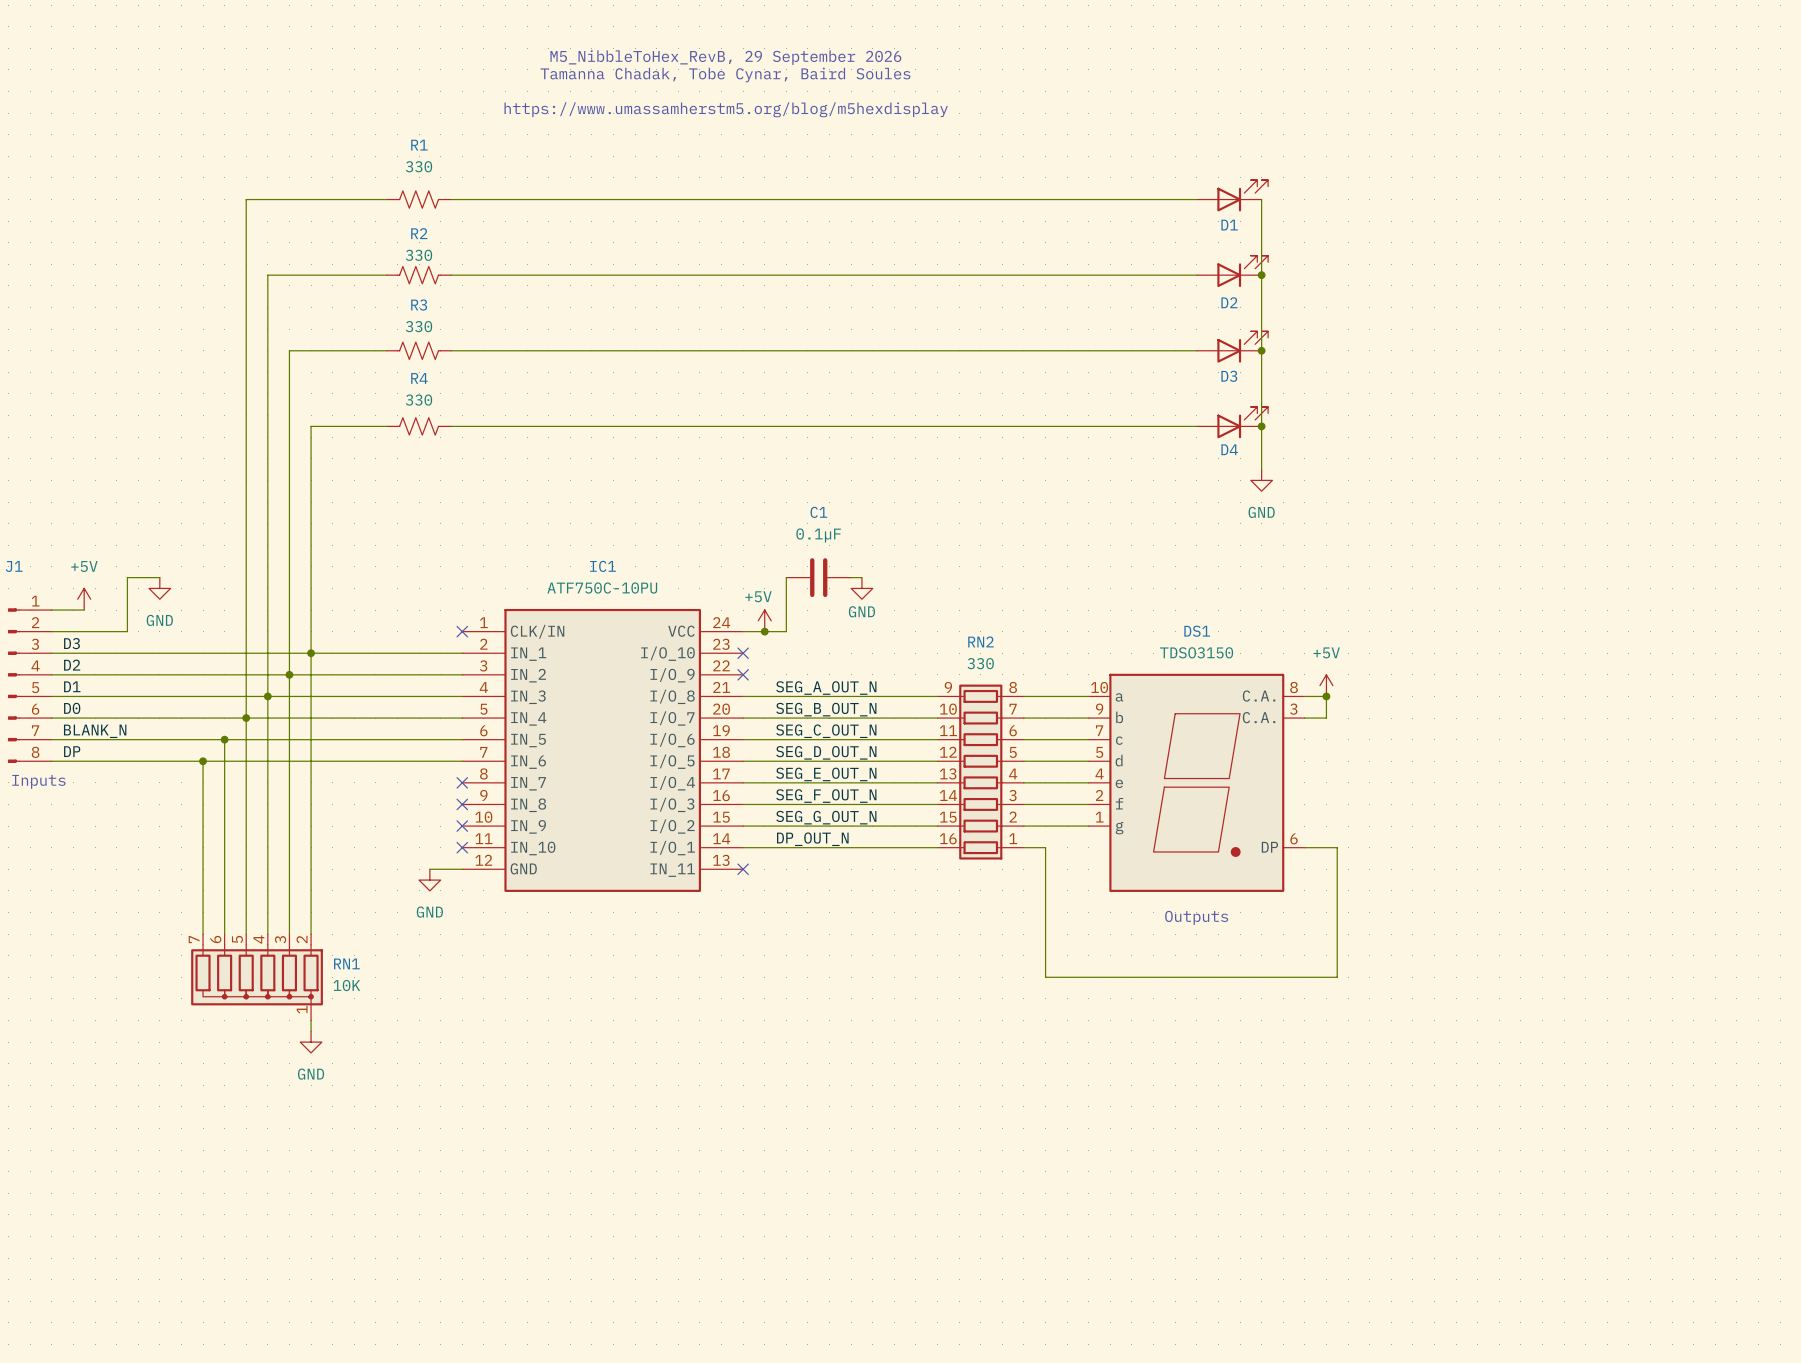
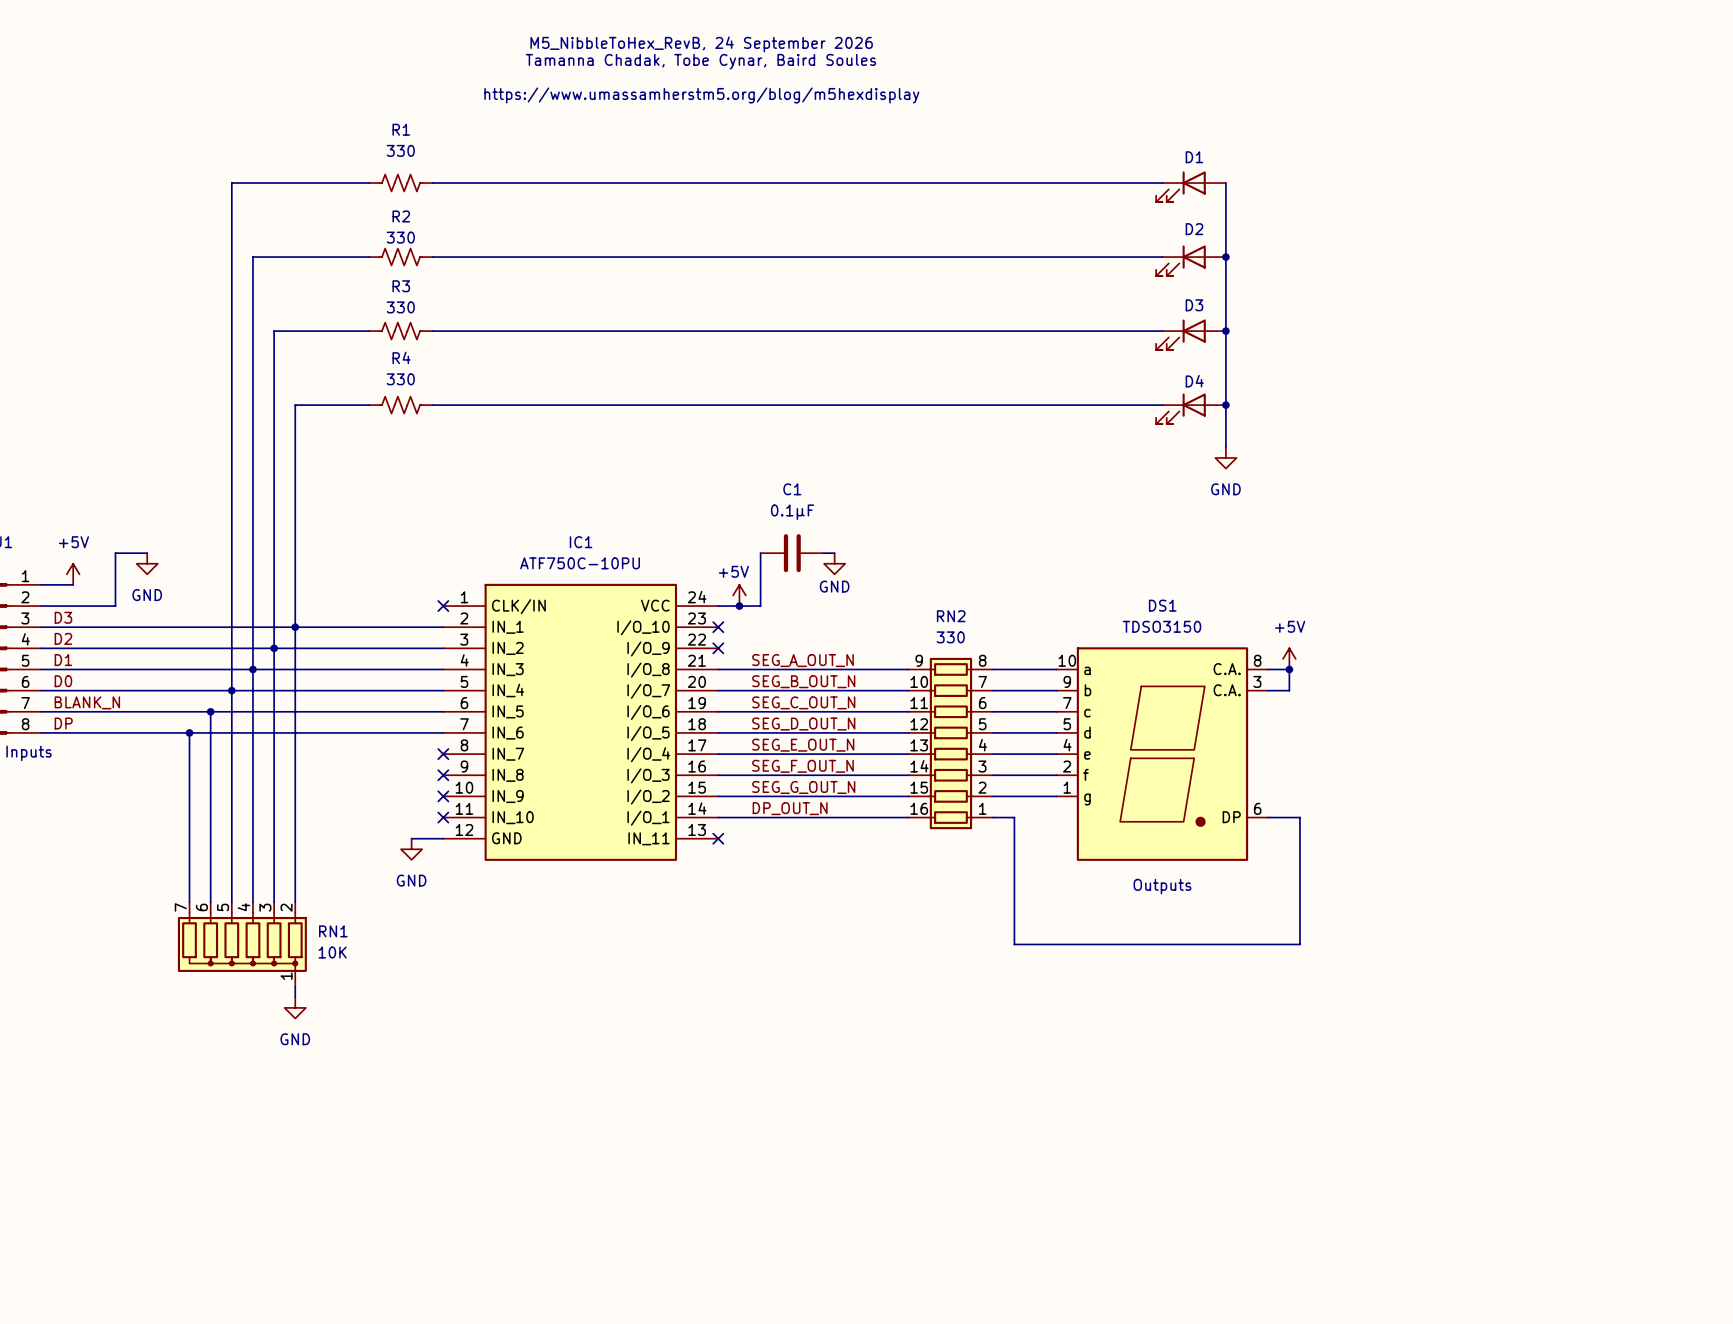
text: M5_NibbleToHex_RevB, 29 September 2026 (725, 57) -> M5_NibbleToHex_RevB, 24 September 2026 (701, 44)
D1 rotation: 0° (1242, 195) -> 180° (1180, 186)
D2 rotation: 0° (1242, 271) -> 180° (1180, 260)
D3 rotation: 0° (1242, 347) -> 180° (1180, 334)
D4 rotation: 0° (1242, 422) -> 180° (1180, 408)

